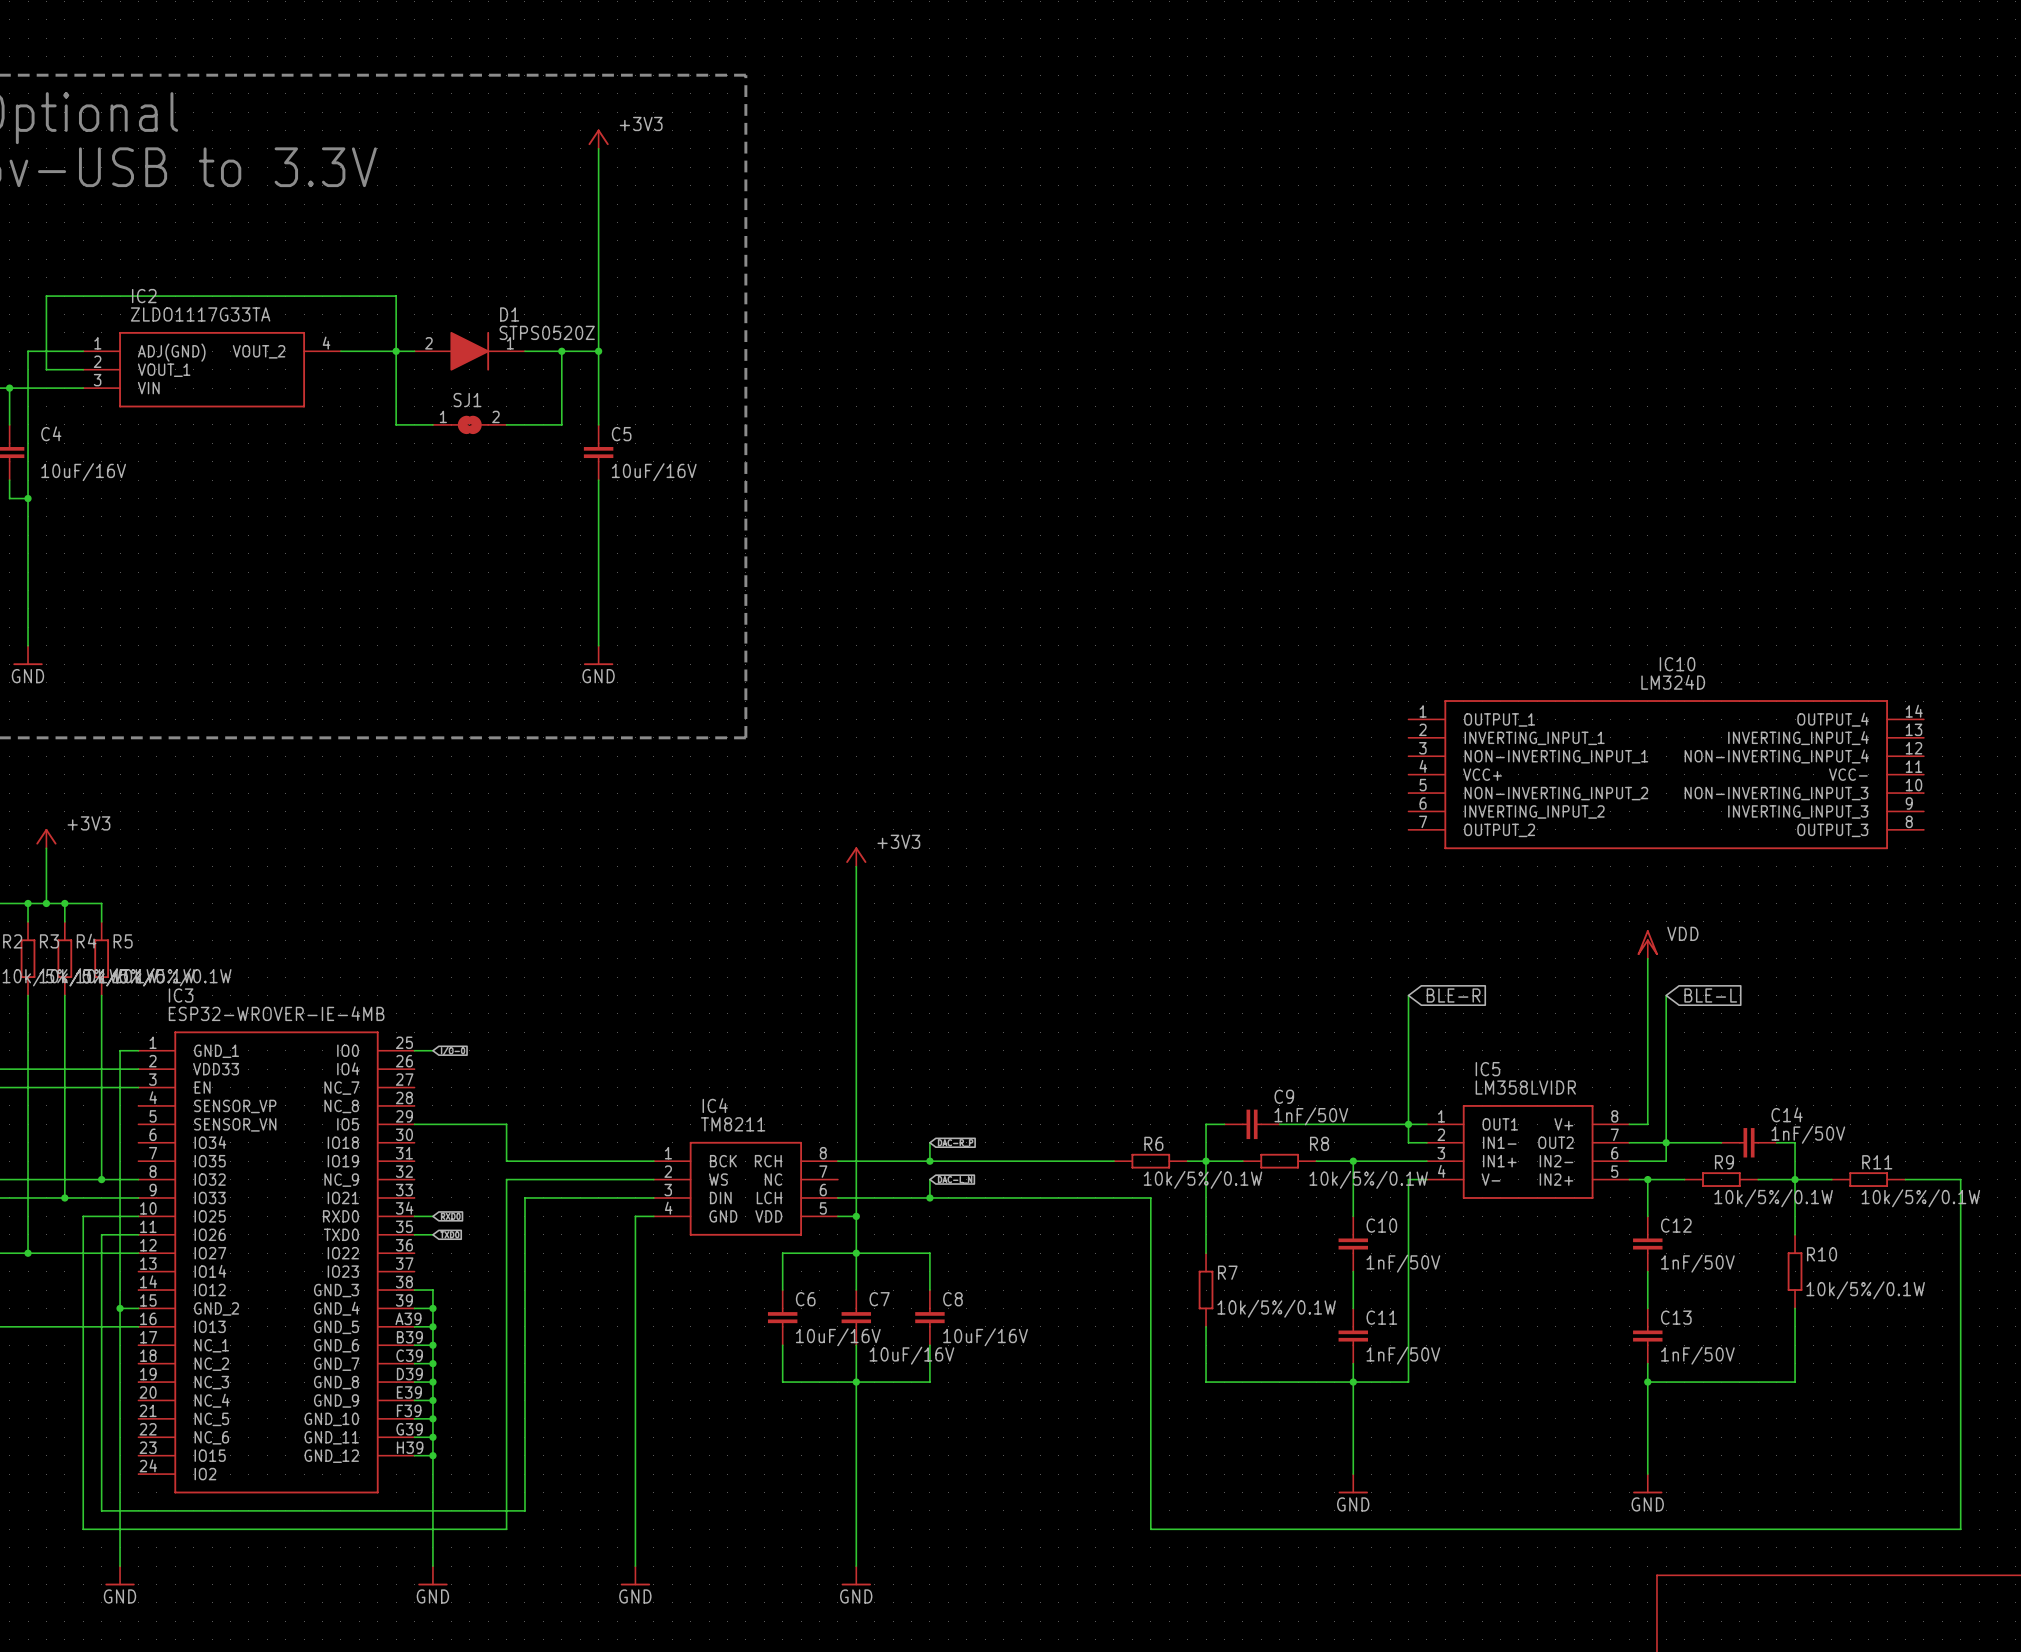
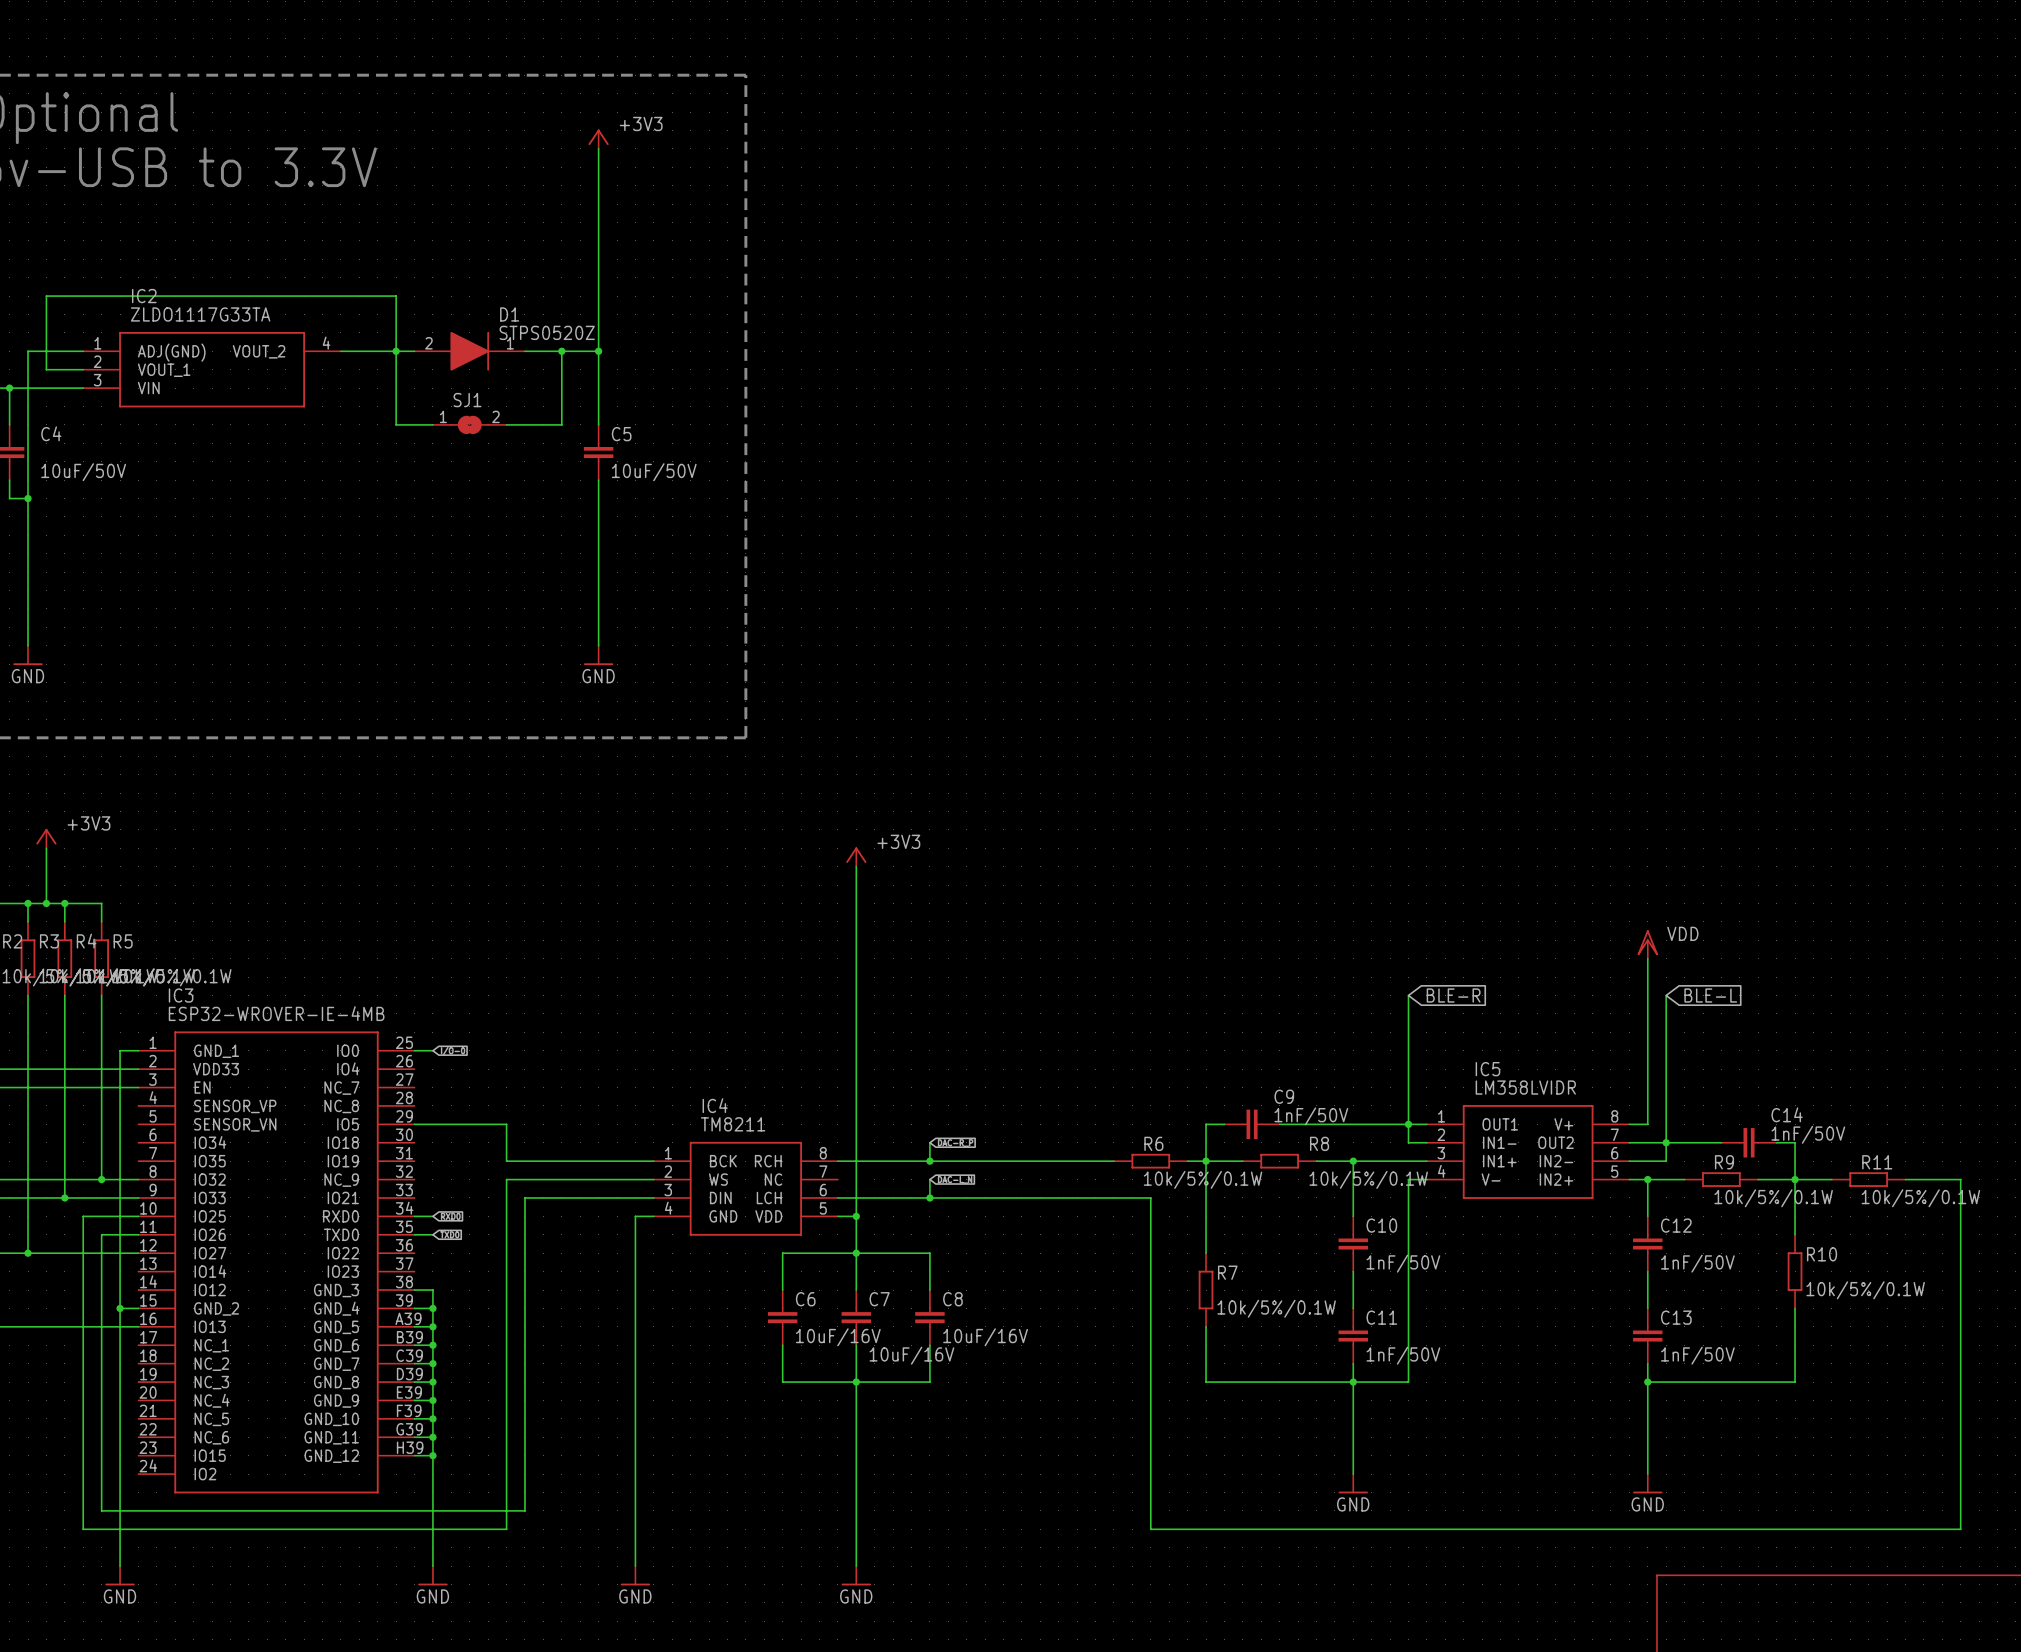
C4 value: 10uF/16V (83, 472) -> 10uF/50V (83, 472)
C5 value: 10uF/16V (654, 472) -> 10uF/50V (654, 472)
IC10: LM324D (1666, 774) -> none

